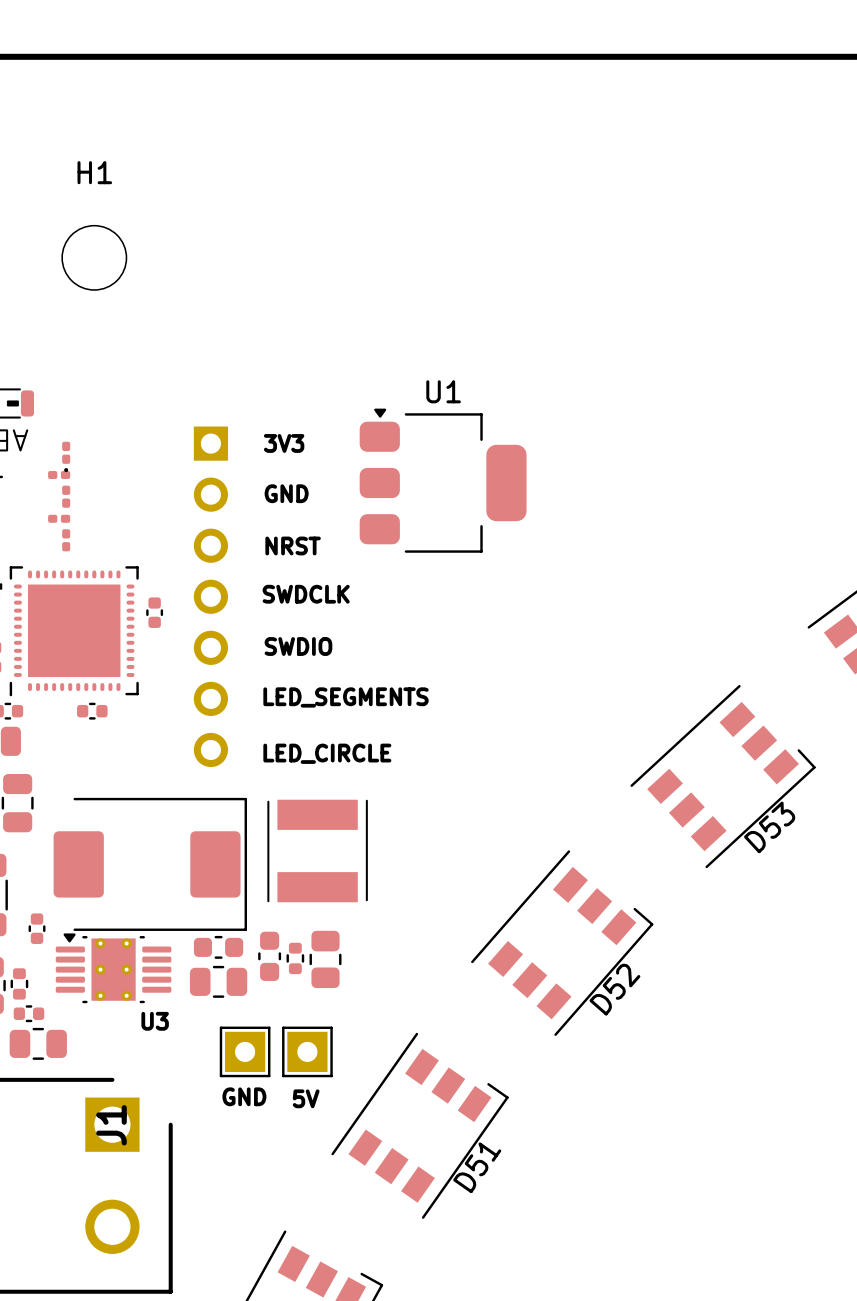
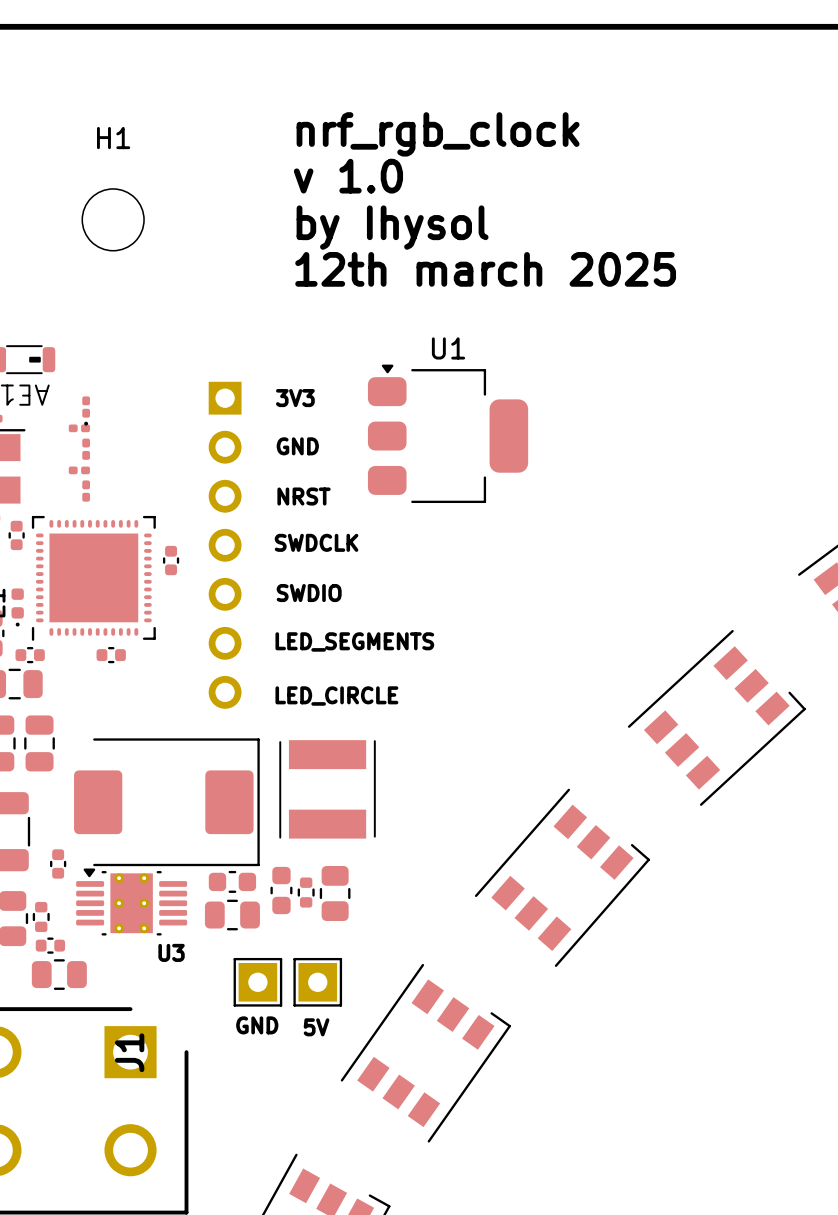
text: none -> nrf_rgb_clock (438, 134)
text: none -> v 1.0 (348, 176)
text: none -> by Ihysol (392, 227)
text: none -> 12th march 2025 (485, 269)
D53 name: D53 (769, 827) -> none
D52 name: D52 (614, 989) -> none
D51 name: D51 (477, 1167) -> none

